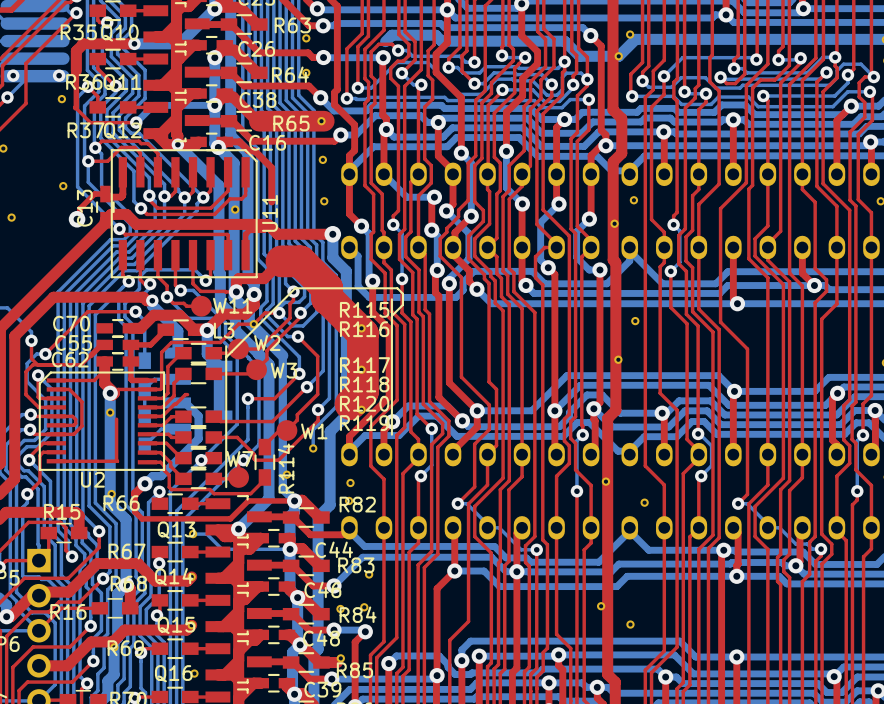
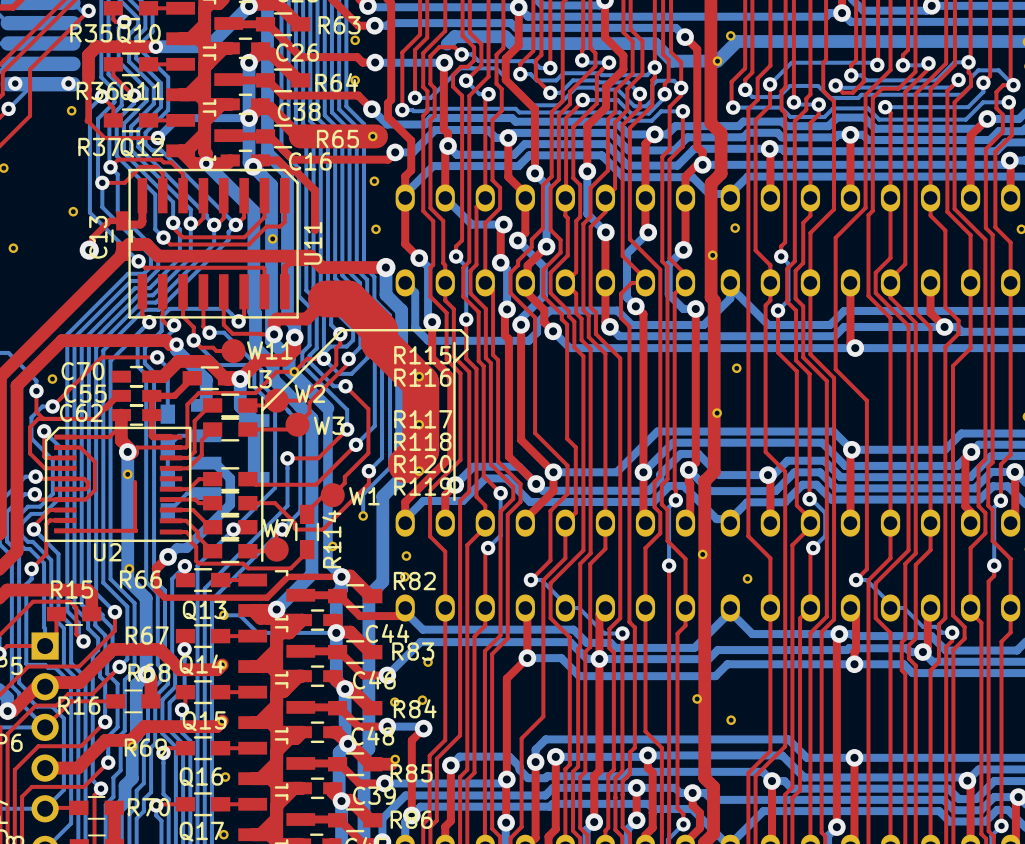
part: none -> (52, 379)
top track: (187, 394) (162, 416) (147, 416) -> none

